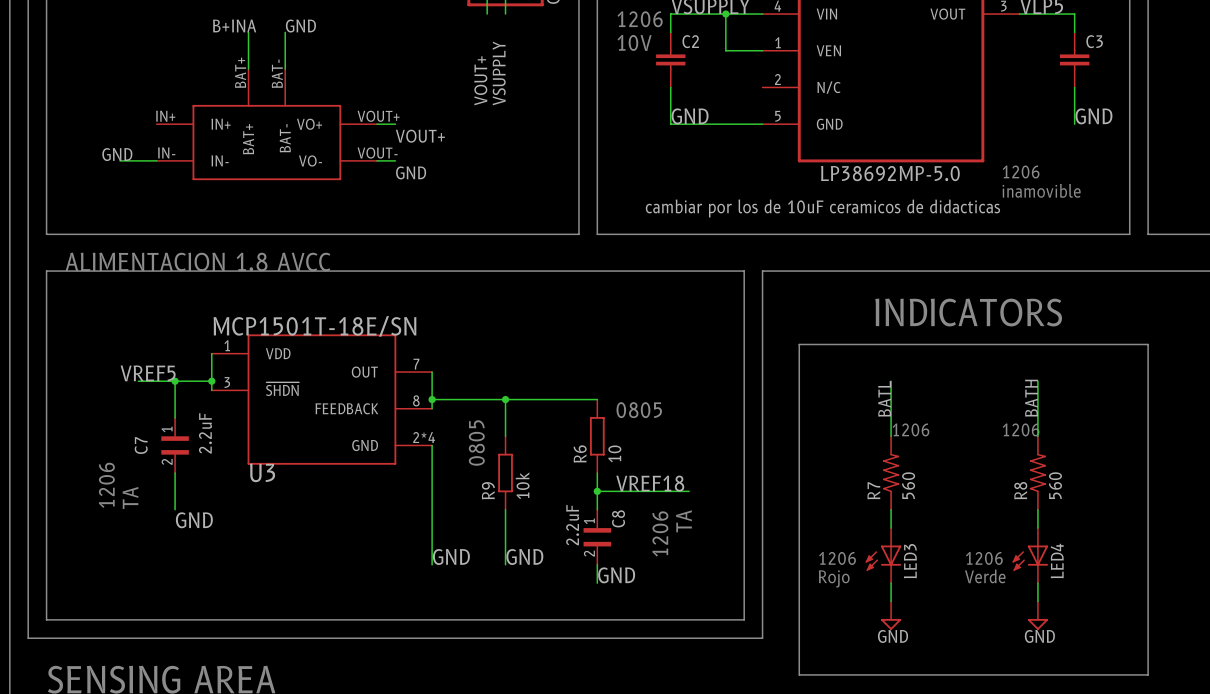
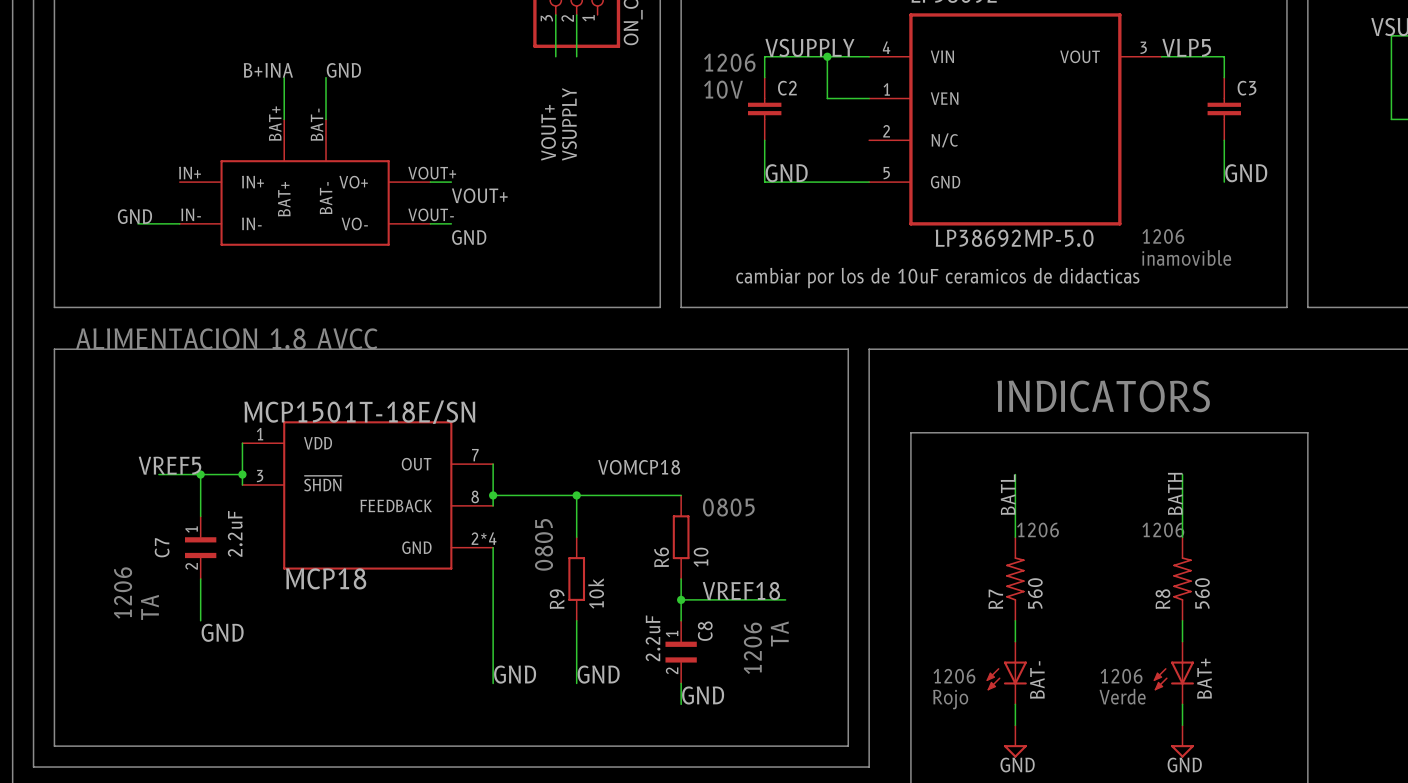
label: none -> VOMCP18 (639, 467)
U3 name: U3 (262, 472) -> MCP18 (326, 578)
LED4 name: LED4 (1057, 560) -> BAT+ (1204, 678)
LED3 name: LED3 (910, 561) -> BAT- (1037, 679)

